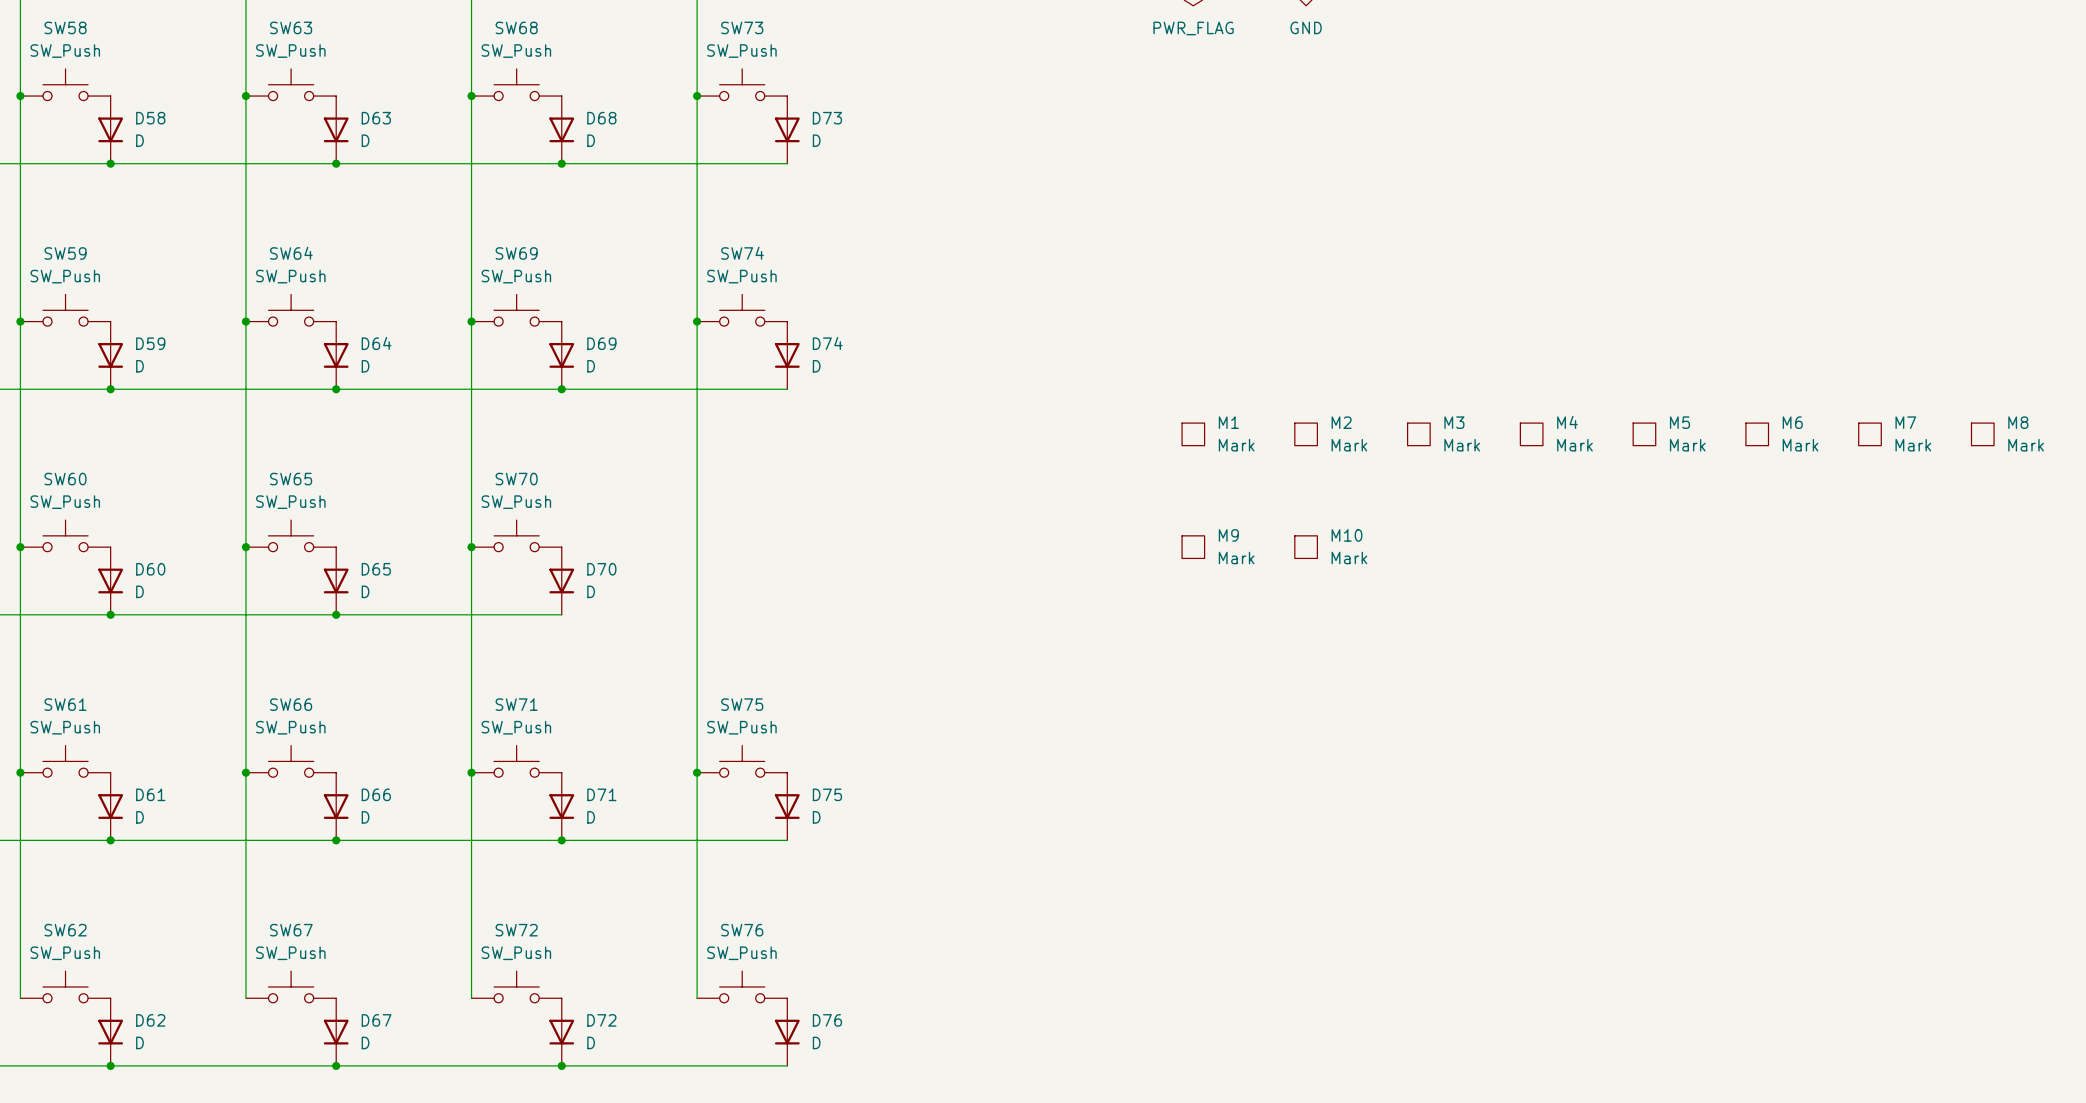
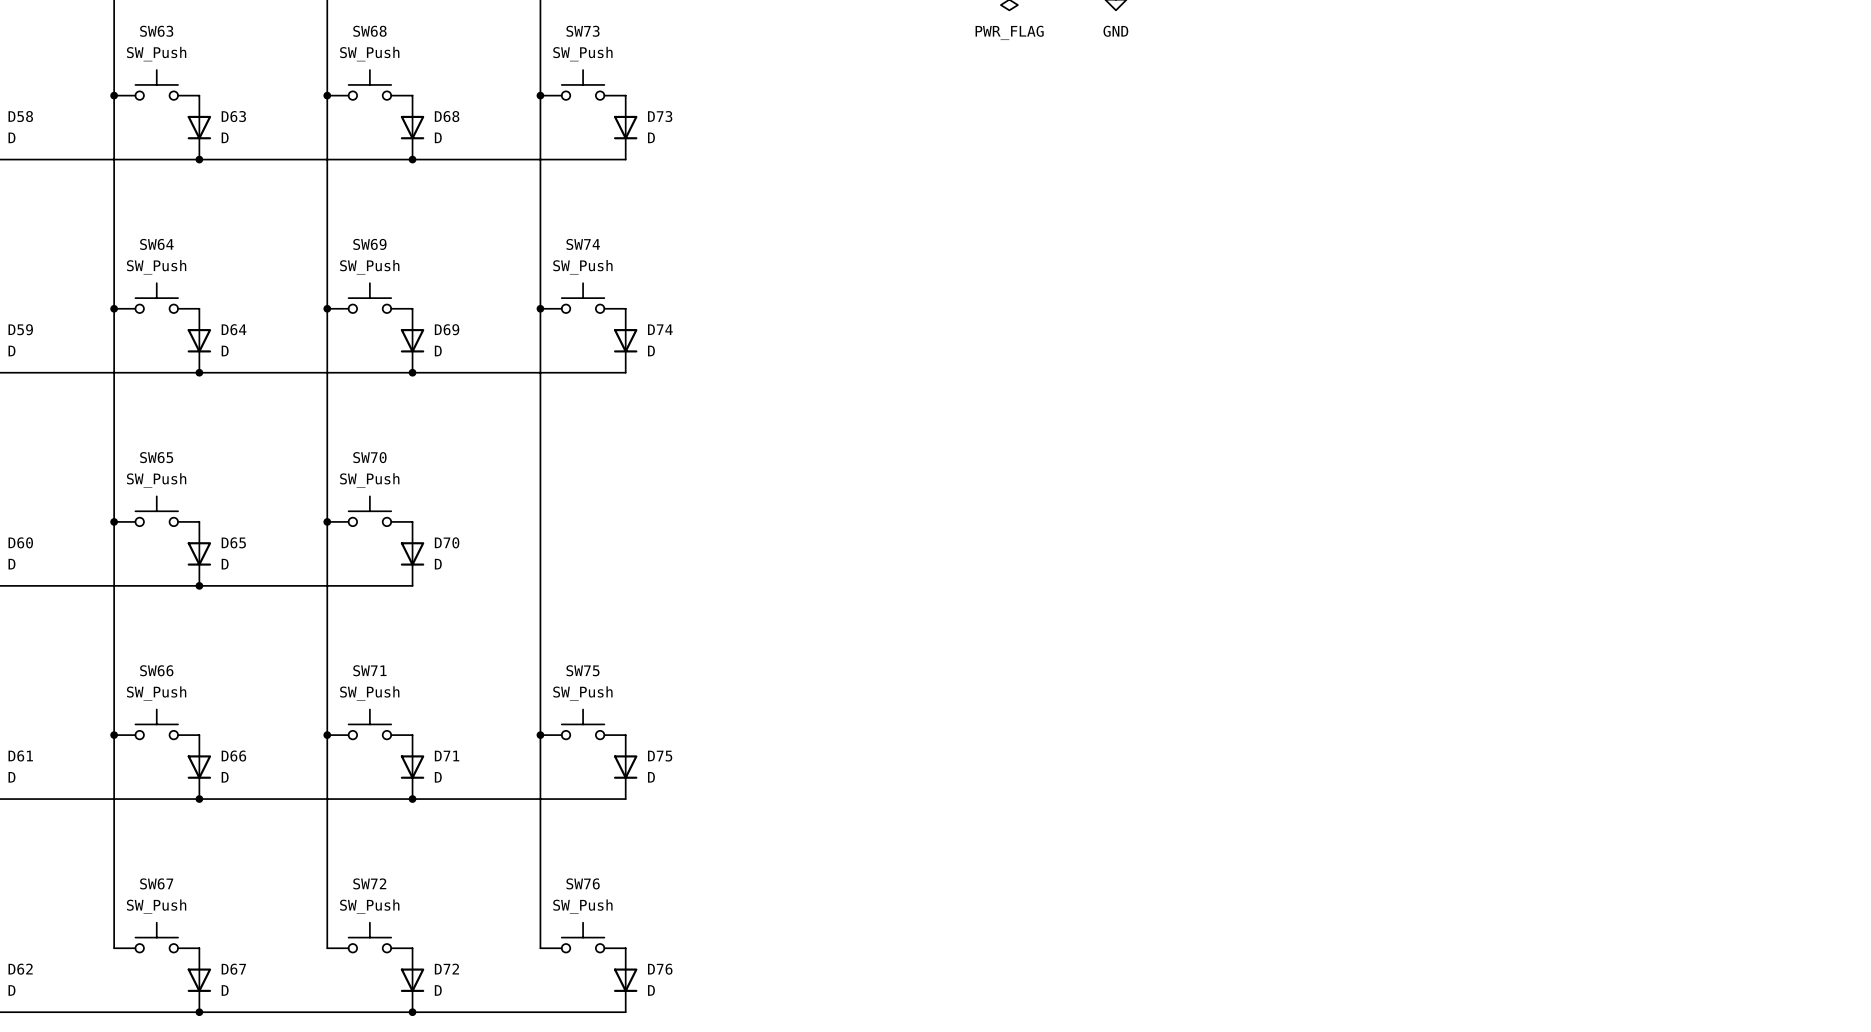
M1: Mark (1193, 434) -> none
M2: Mark (1306, 434) -> none
M3: Mark (1418, 434) -> none
M4: Mark (1531, 434) -> none
M5: Mark (1644, 434) -> none
M6: Mark (1757, 434) -> none
M7: Mark (1869, 434) -> none
M8: Mark (1982, 434) -> none
M9: Mark (1193, 547) -> none
M10: Mark (1306, 547) -> none

